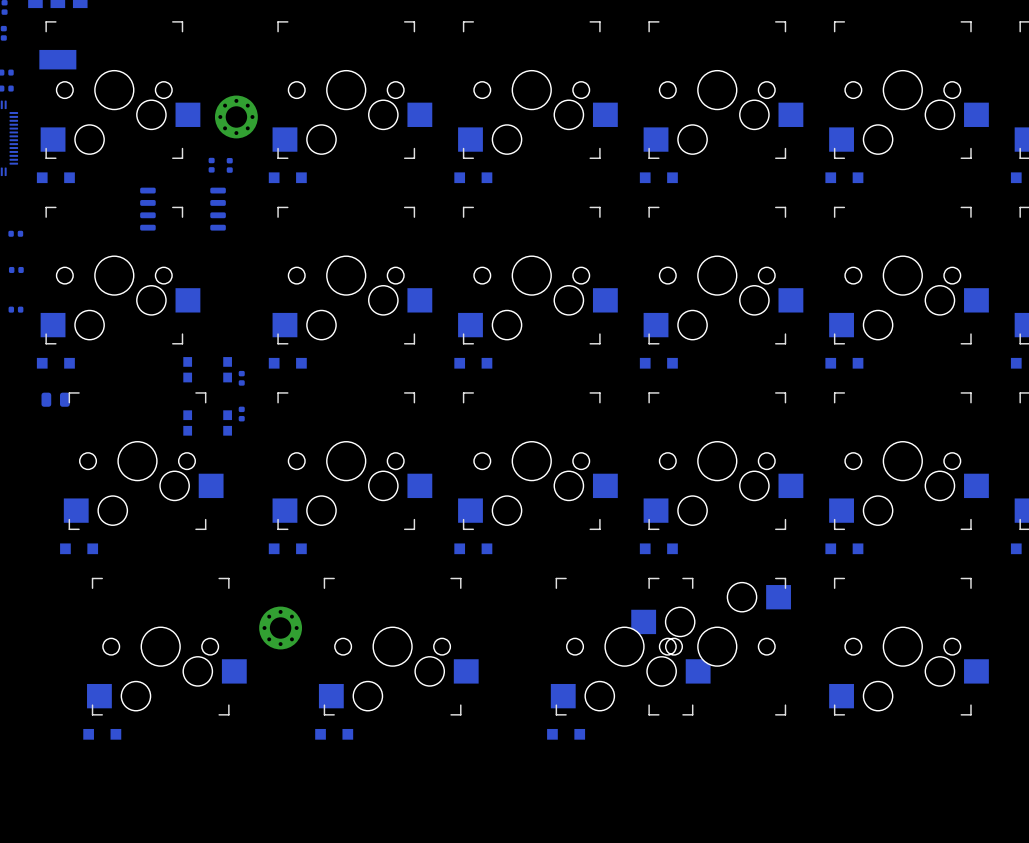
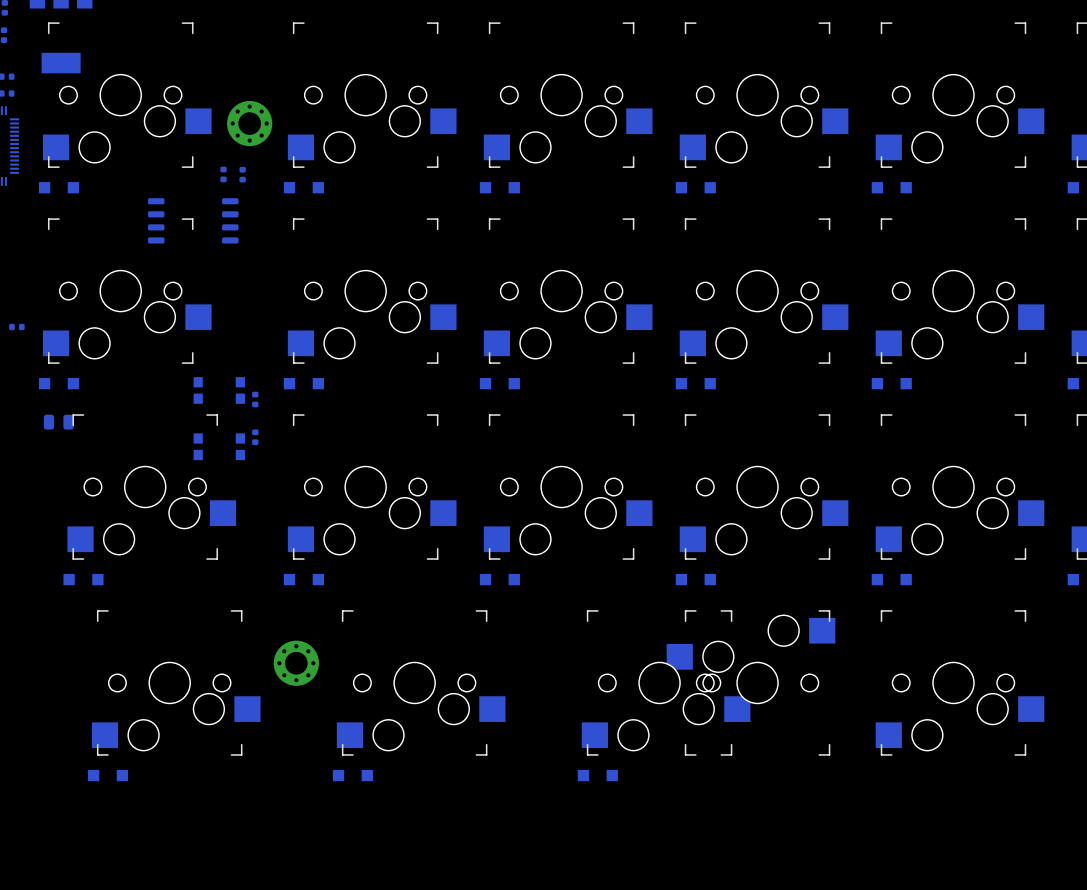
part: (15, 233) -> none
part: (16, 269) -> none

